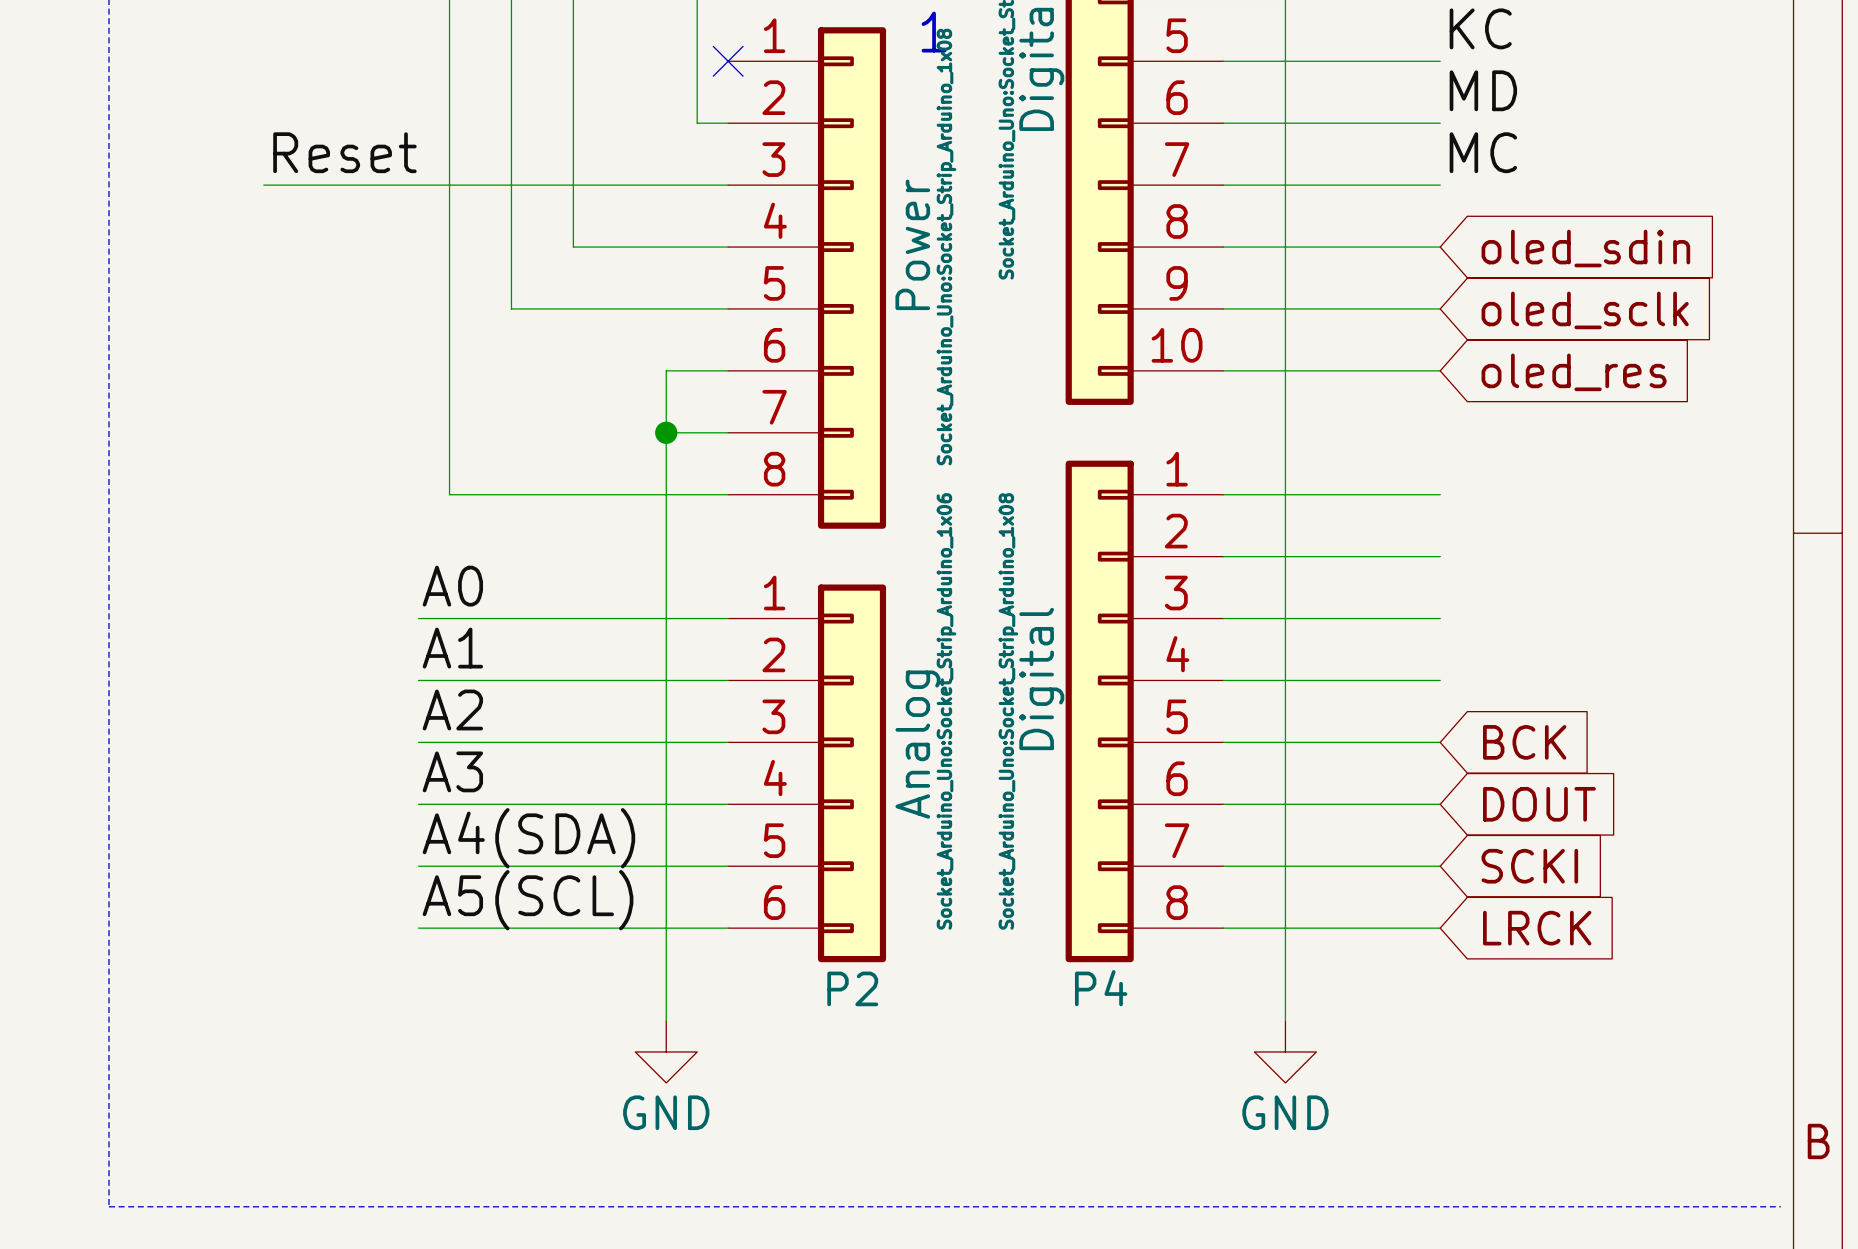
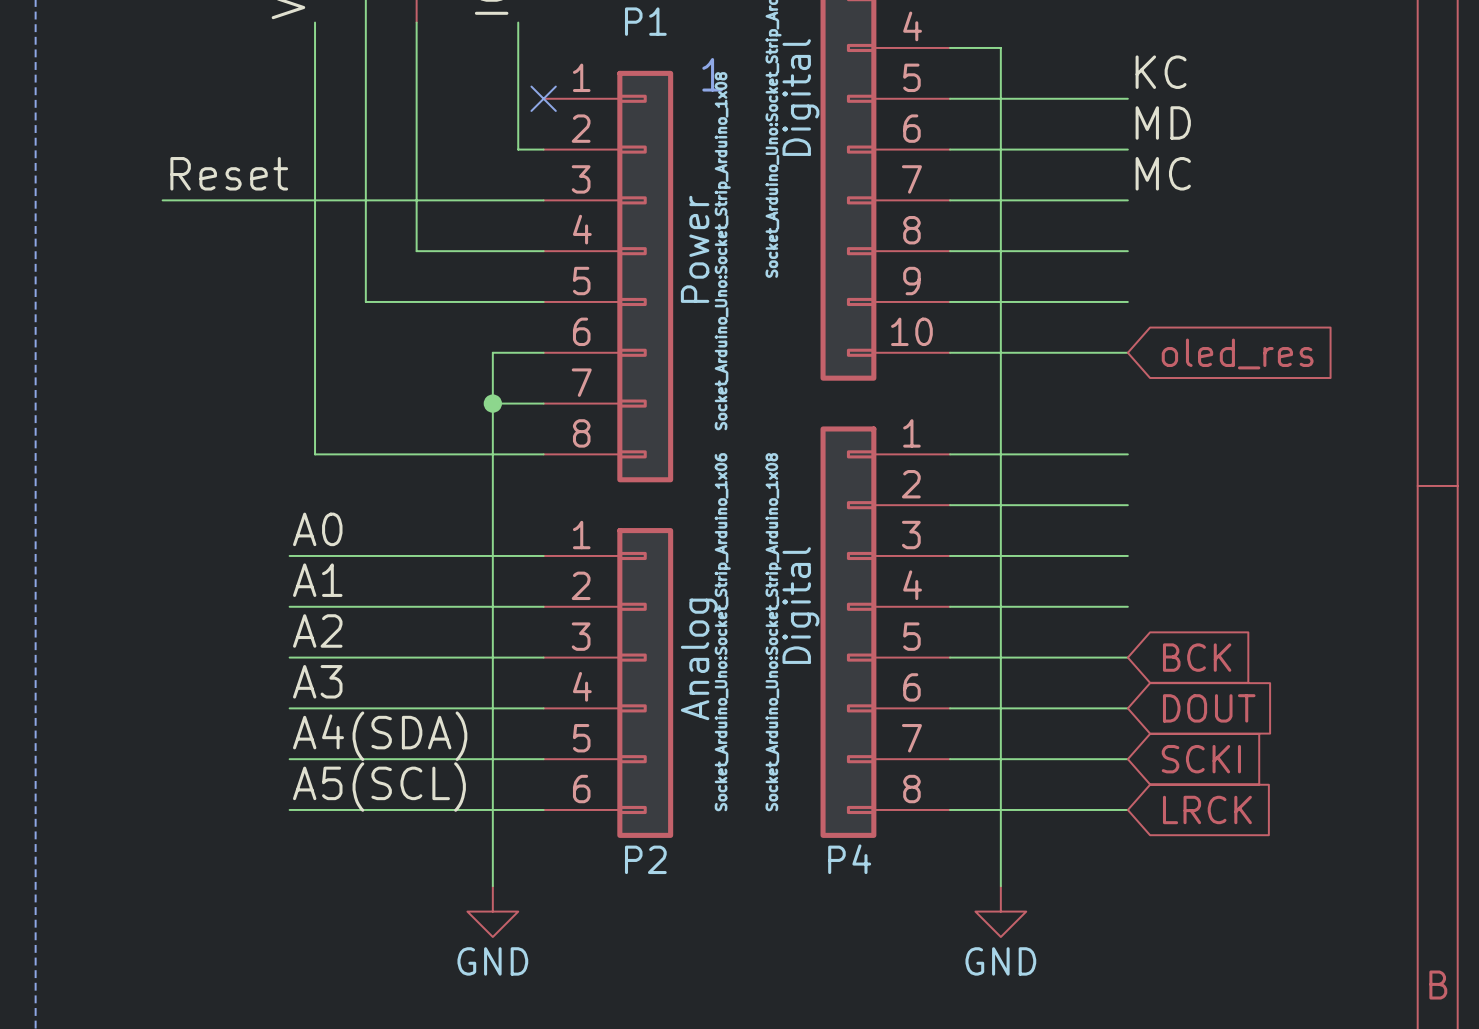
global label: oled_sdin (1585, 248) -> none
global label: oled_sclk (1585, 310) -> none

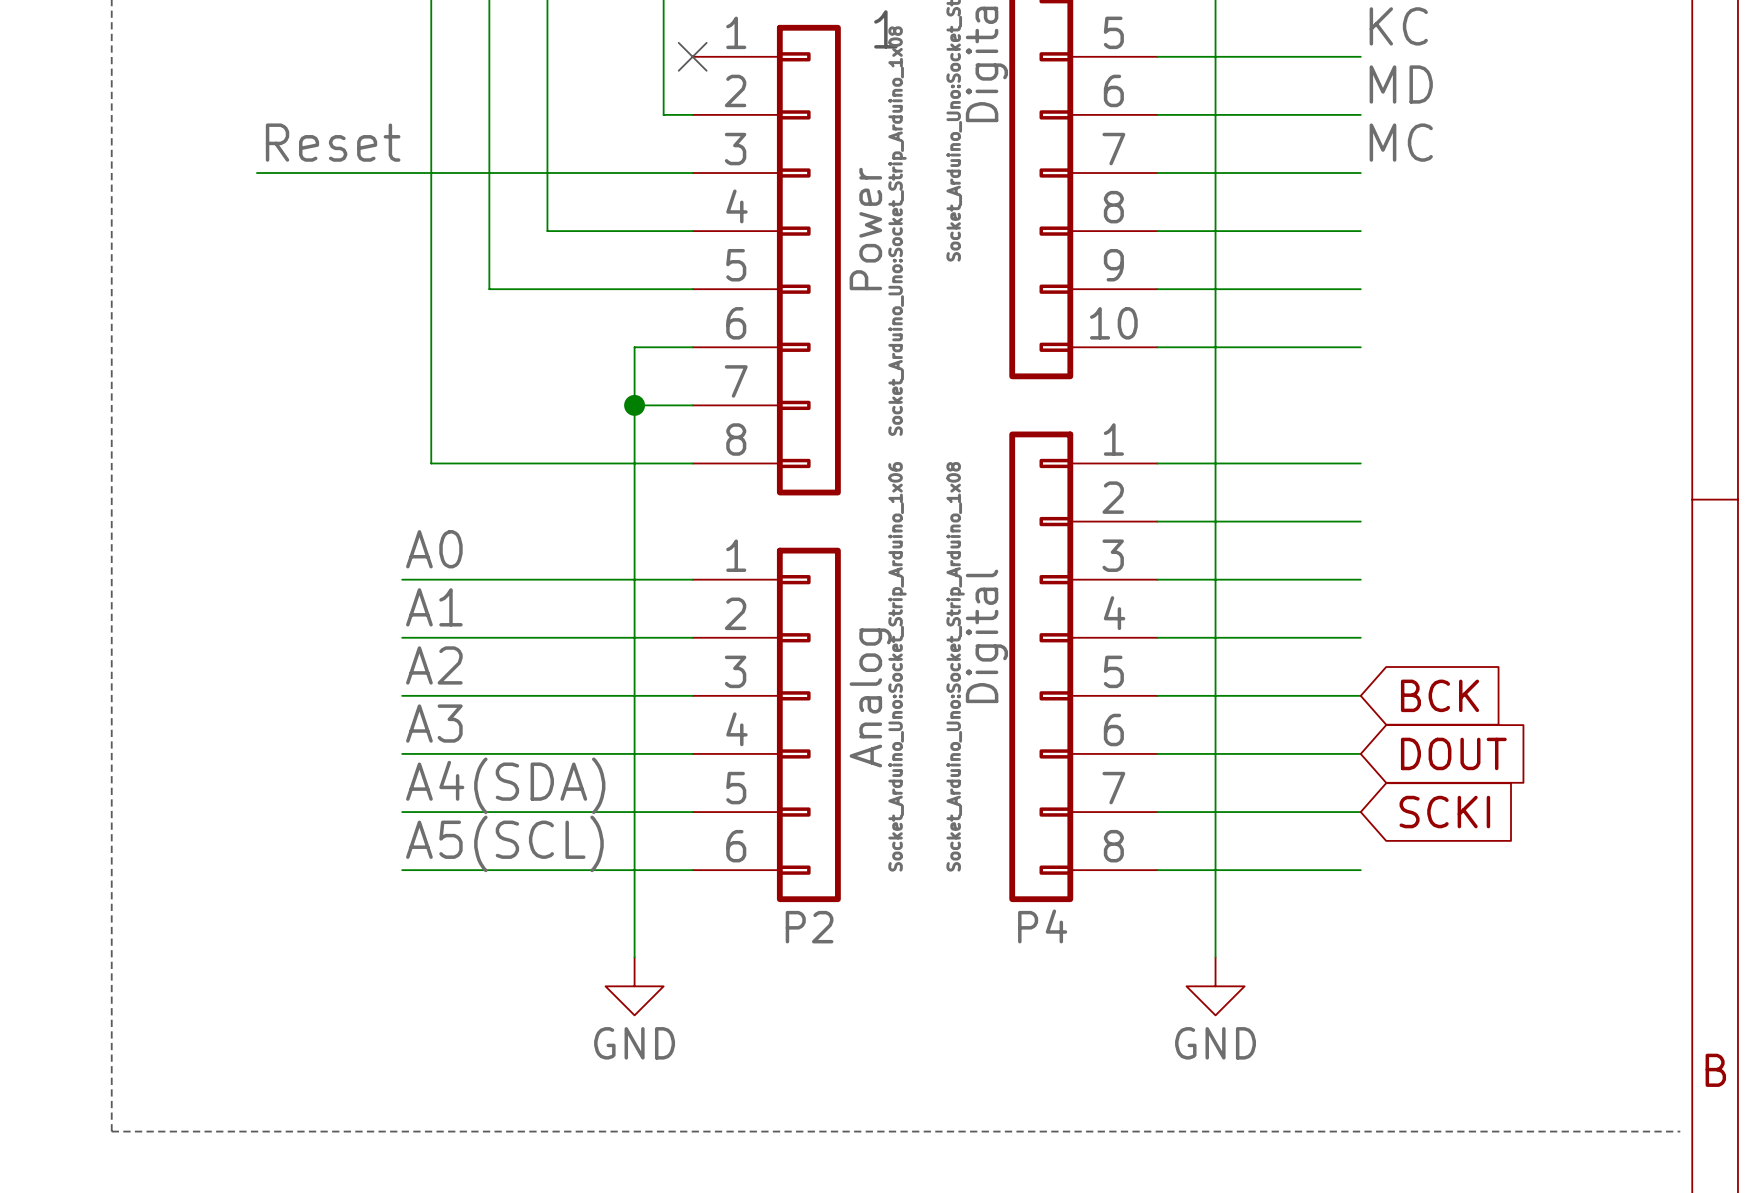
global label: oled_res (1237, 353) -> none
global label: LRCK (1207, 809) -> none

